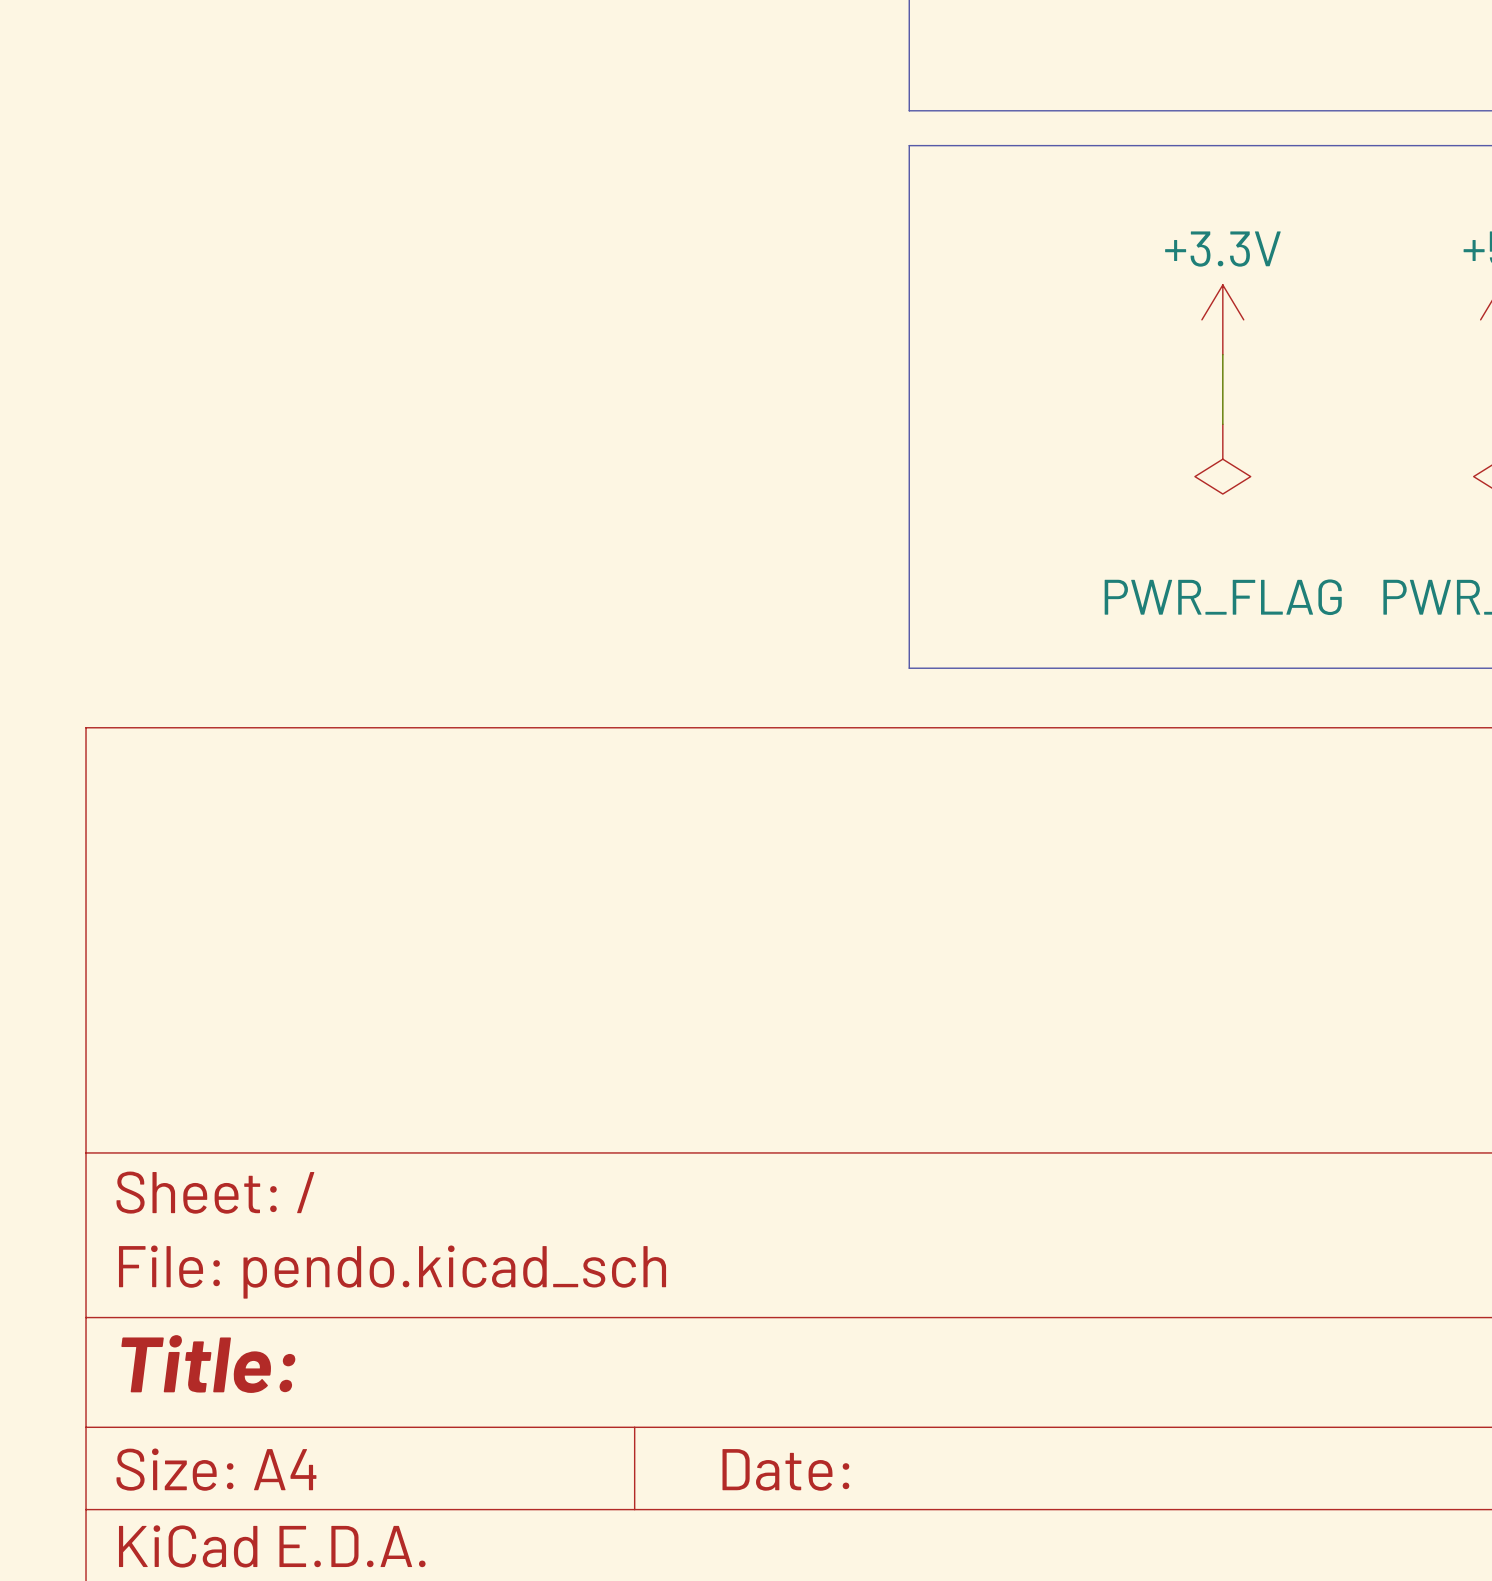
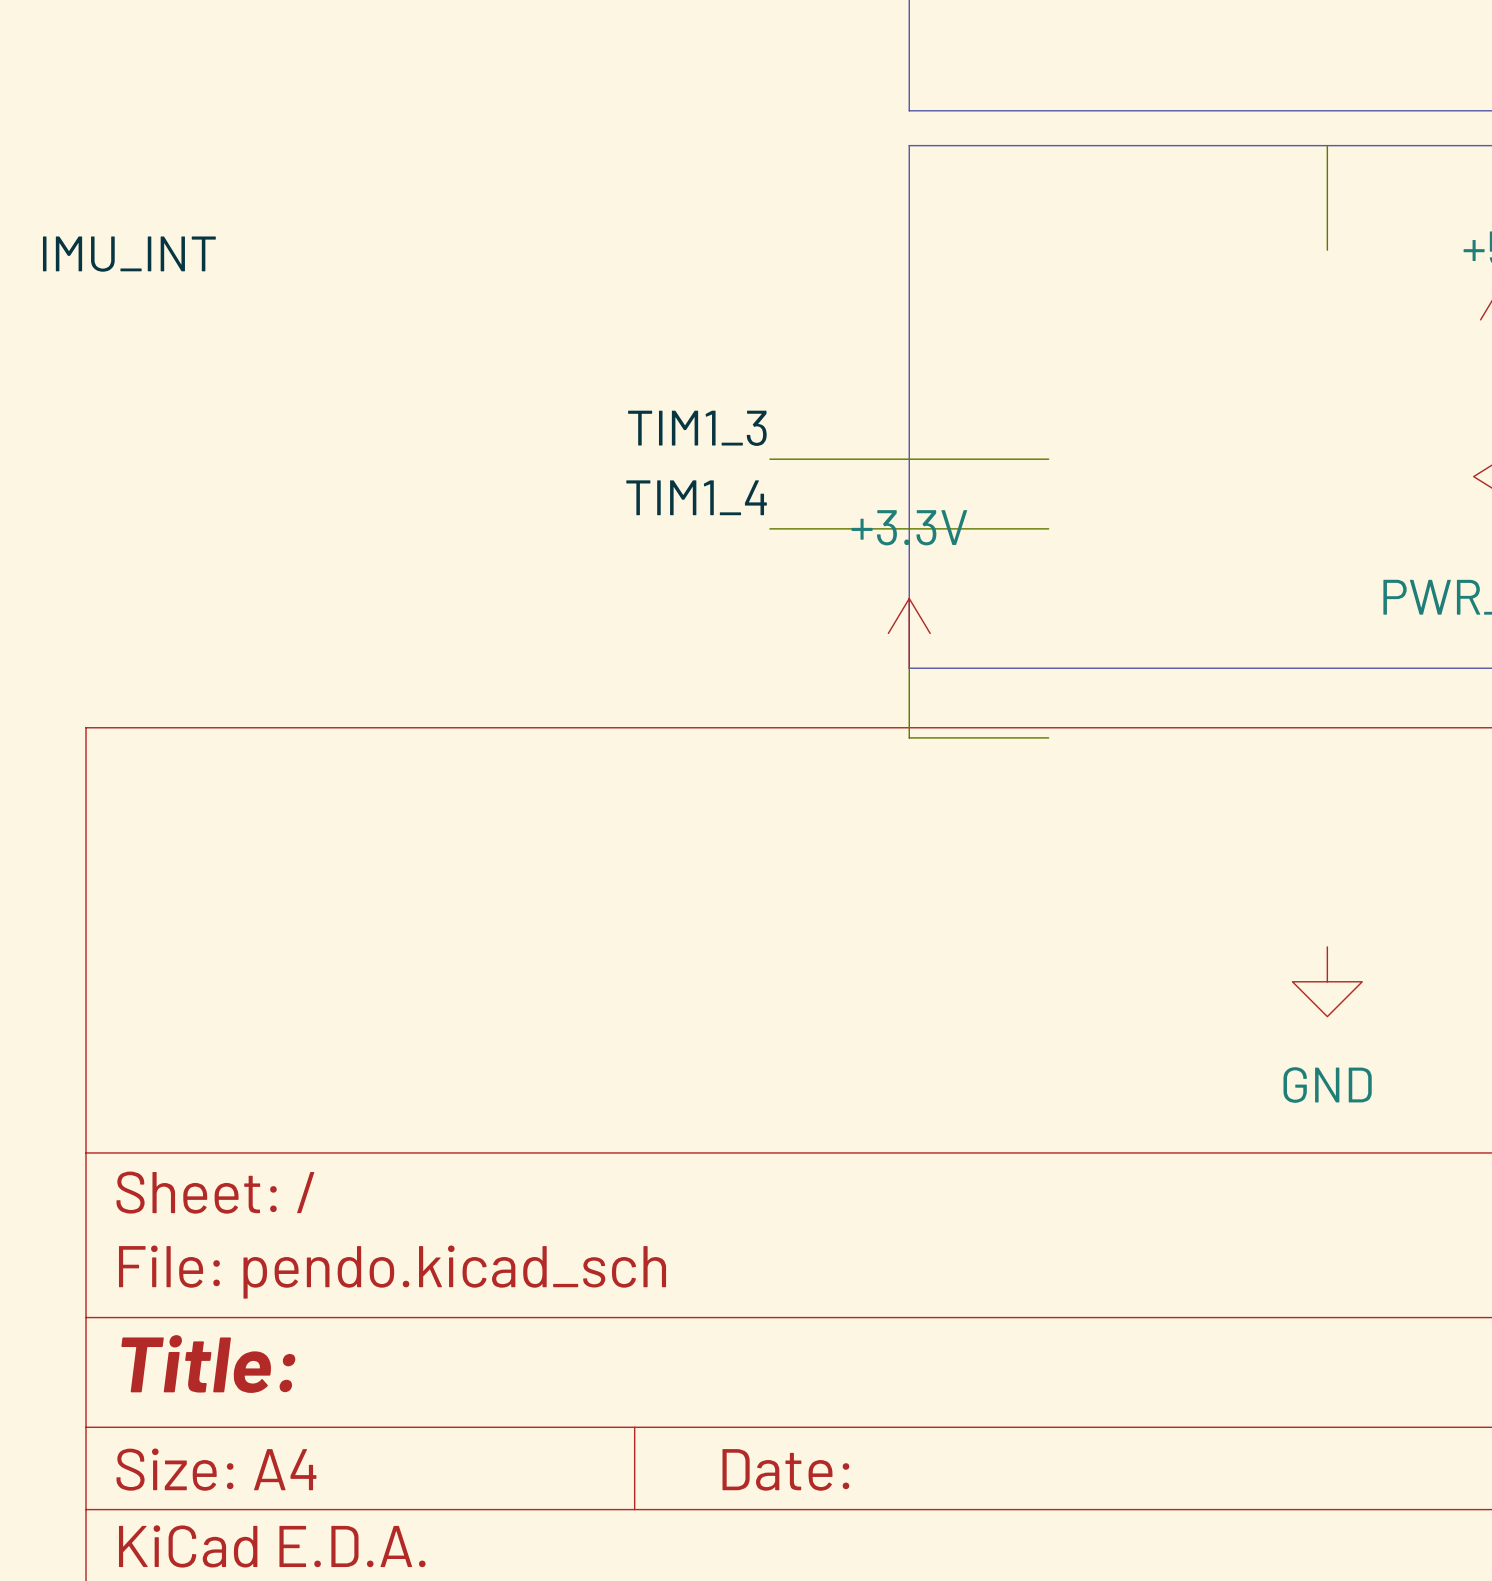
wire: none -> (1327, 145) (1327, 250)
power symbol text position: +3.3V (1222, 249) -> +3.3V (909, 527)
label: none -> IMU_INT (129, 254)
power symbol position: +3.3V (1222, 319) -> +3.3V (909, 633)
wire: (1222, 354) (1222, 424) -> none
label: none -> TIM1_3 (697, 428)
wire: none -> (769, 459) (1048, 459)
power symbol: PWR_FLAG (1222, 459) -> none
label: none -> TIM1_4 (696, 497)
wire: none -> (769, 528) (1048, 528)
wire: none -> (909, 668) (909, 737) (1048, 737)
power symbol: none -> GND (1327, 981)

